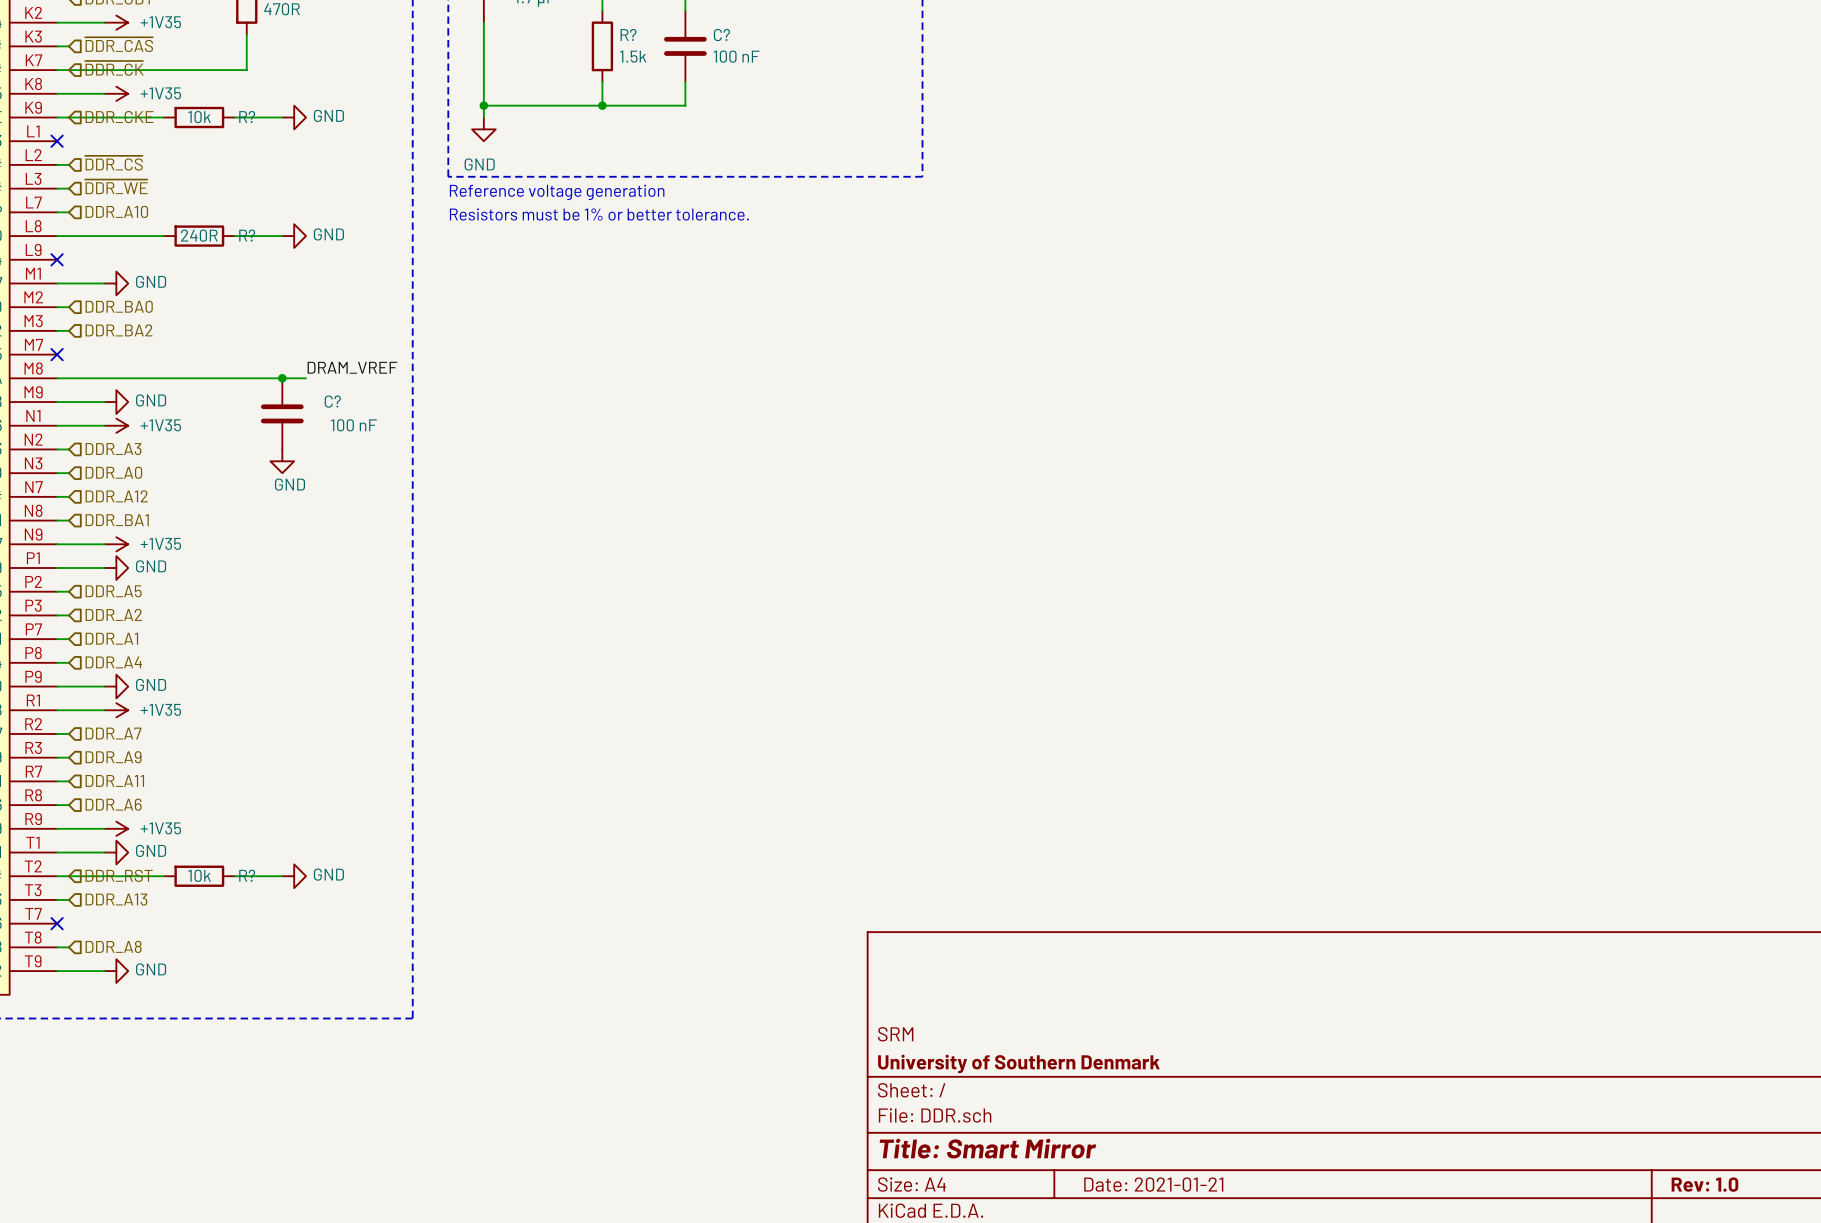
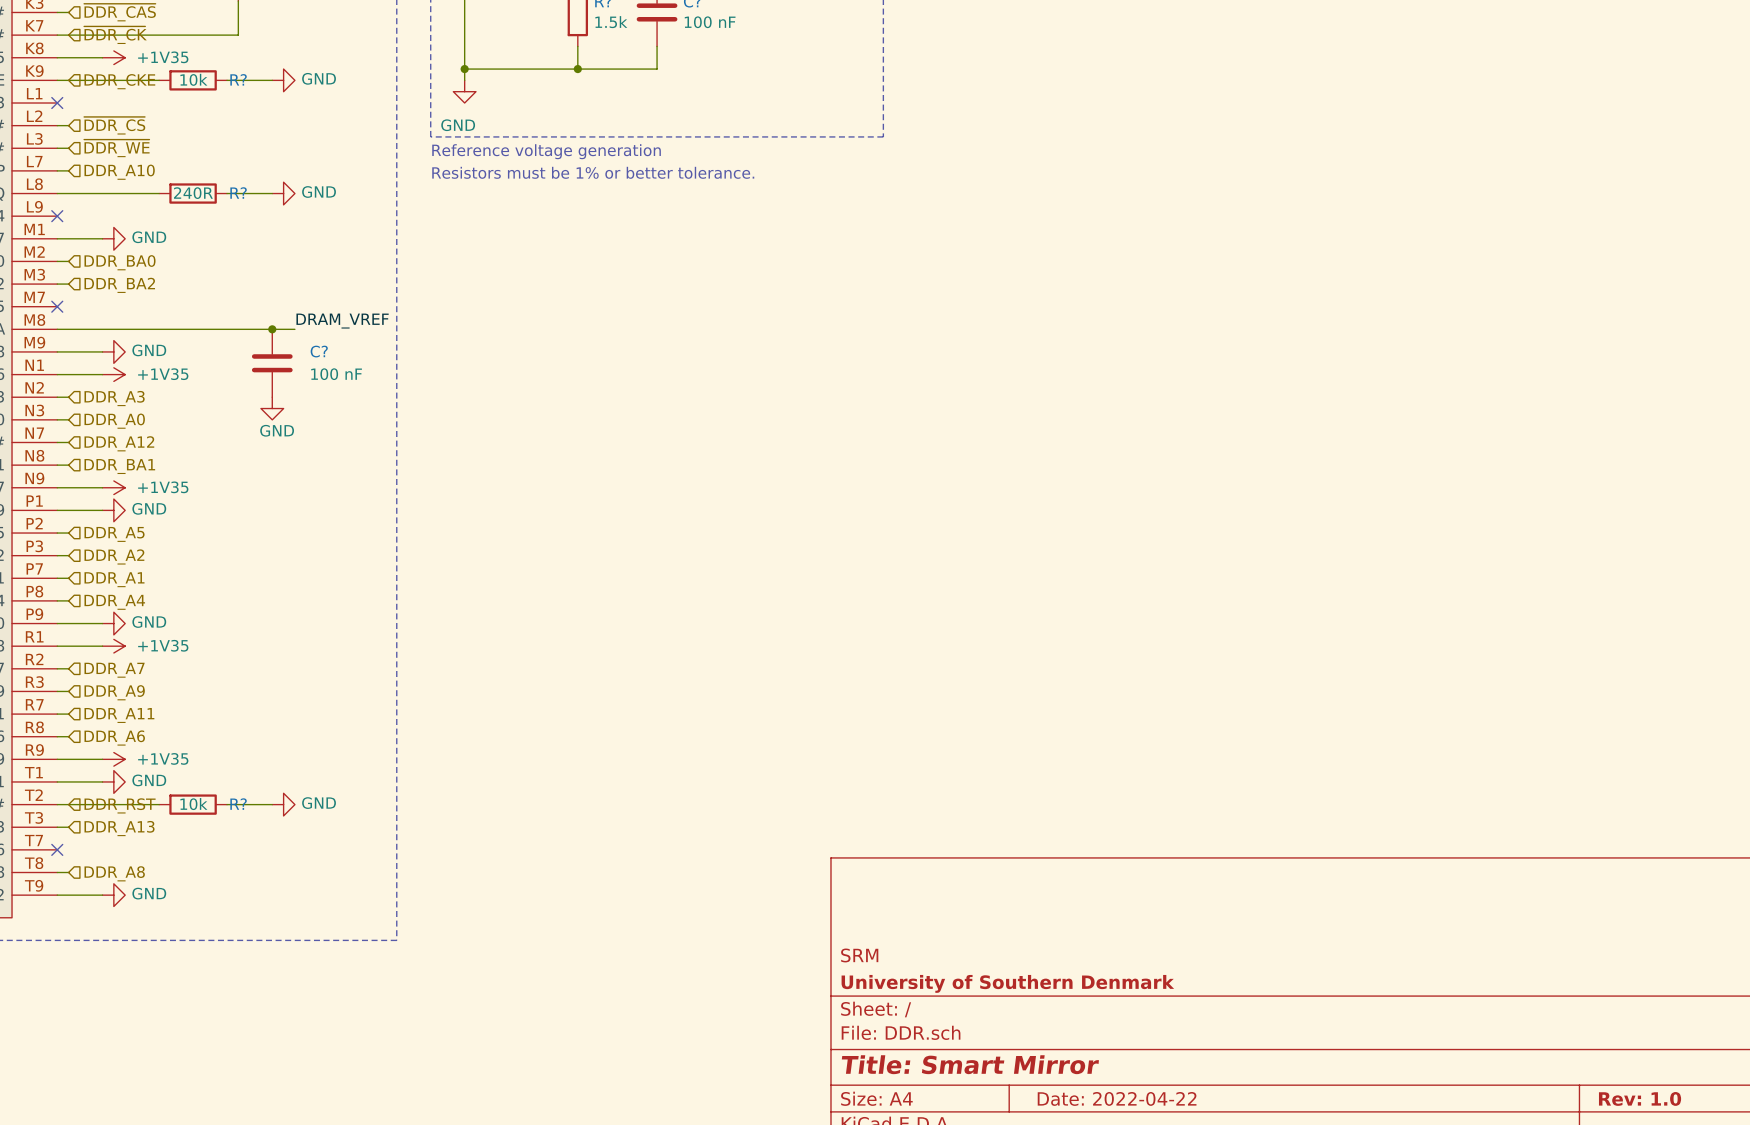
title block: Date: 2021-01-21 (1153, 1184) -> Date: 2022-04-22 (1117, 1098)

